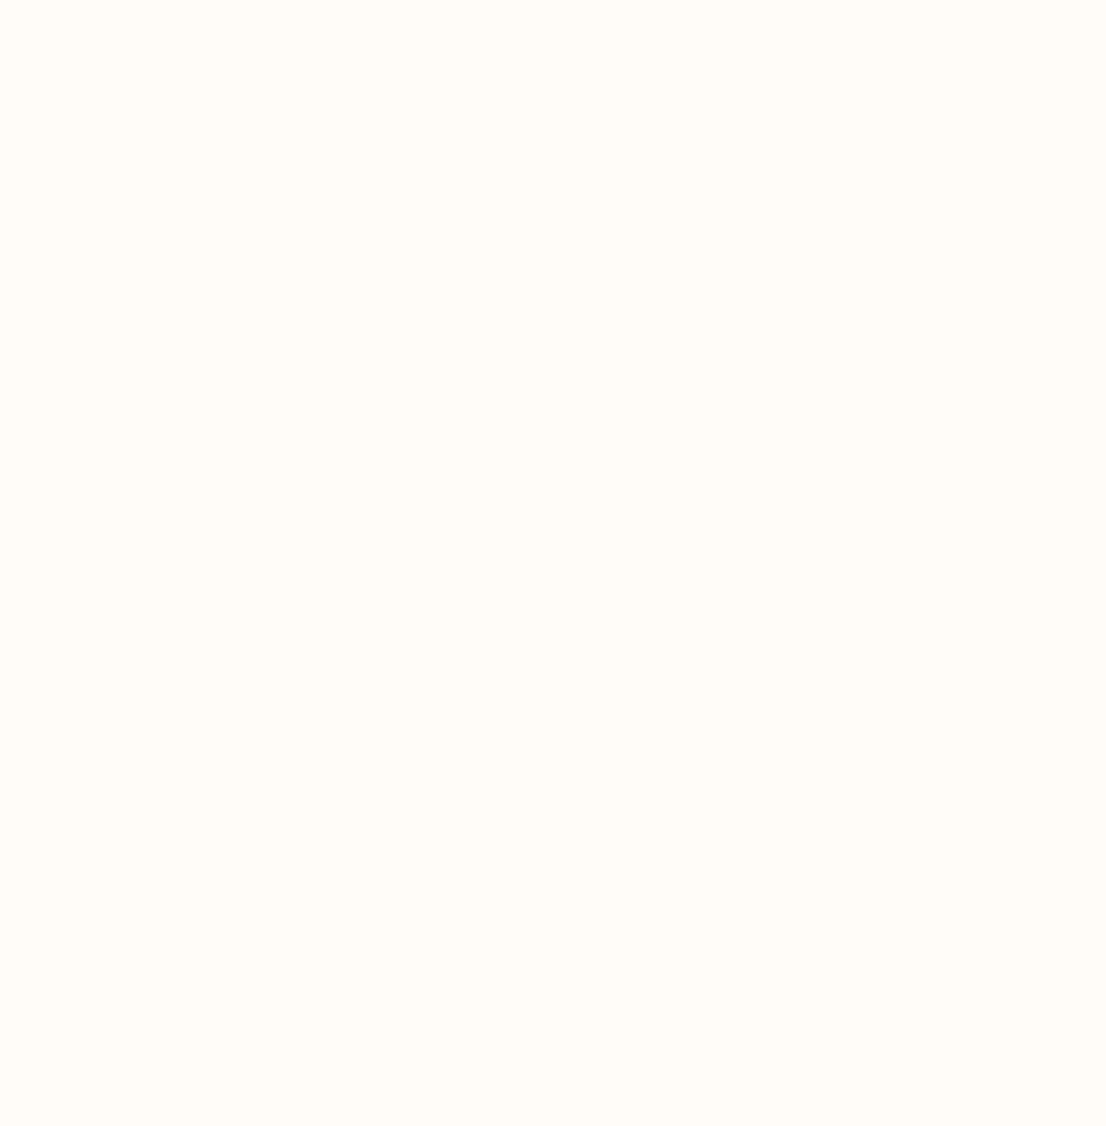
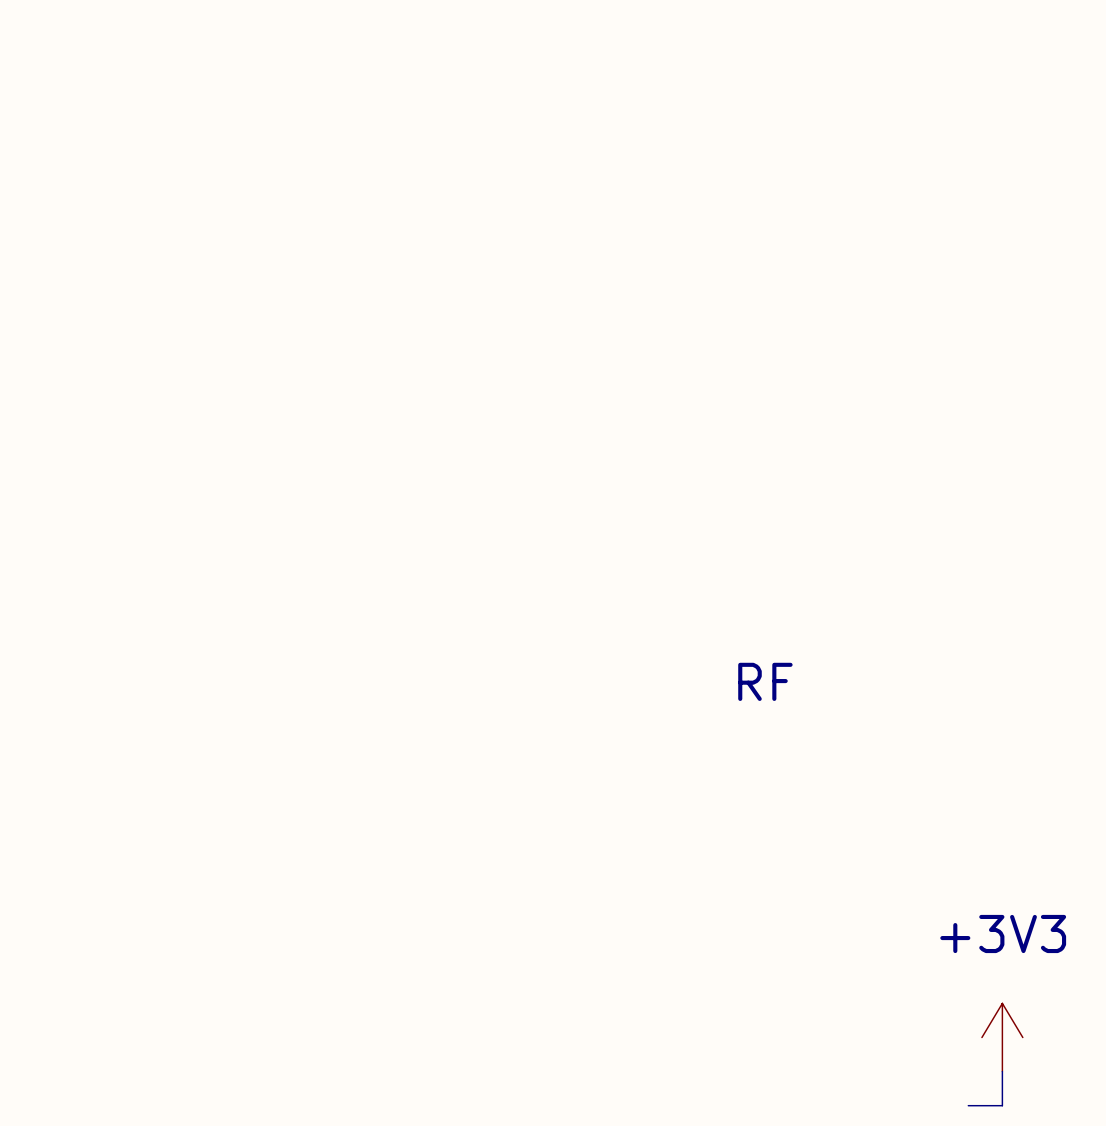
text: none -> RF (765, 681)
power symbol: none -> +3V3 (1002, 1037)
wire: none -> (1002, 1071) (1002, 1105) (968, 1105)

